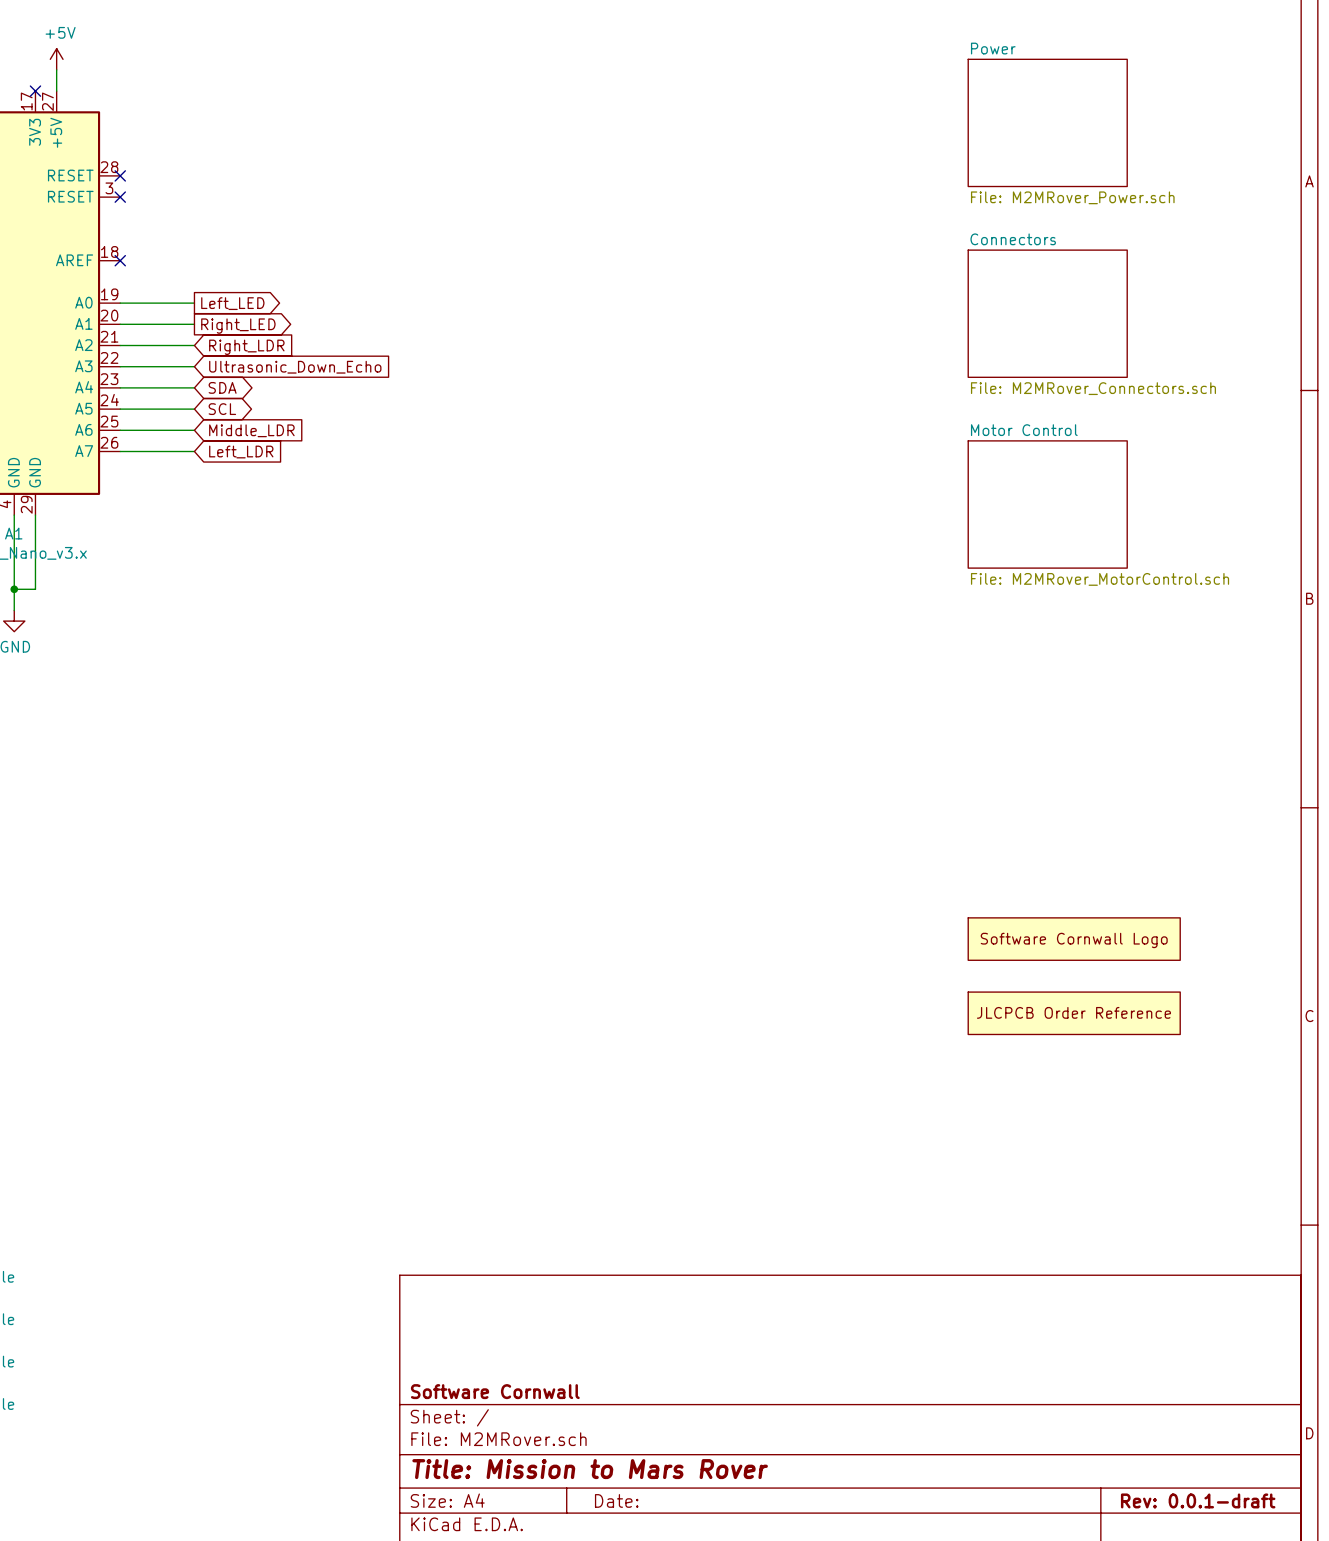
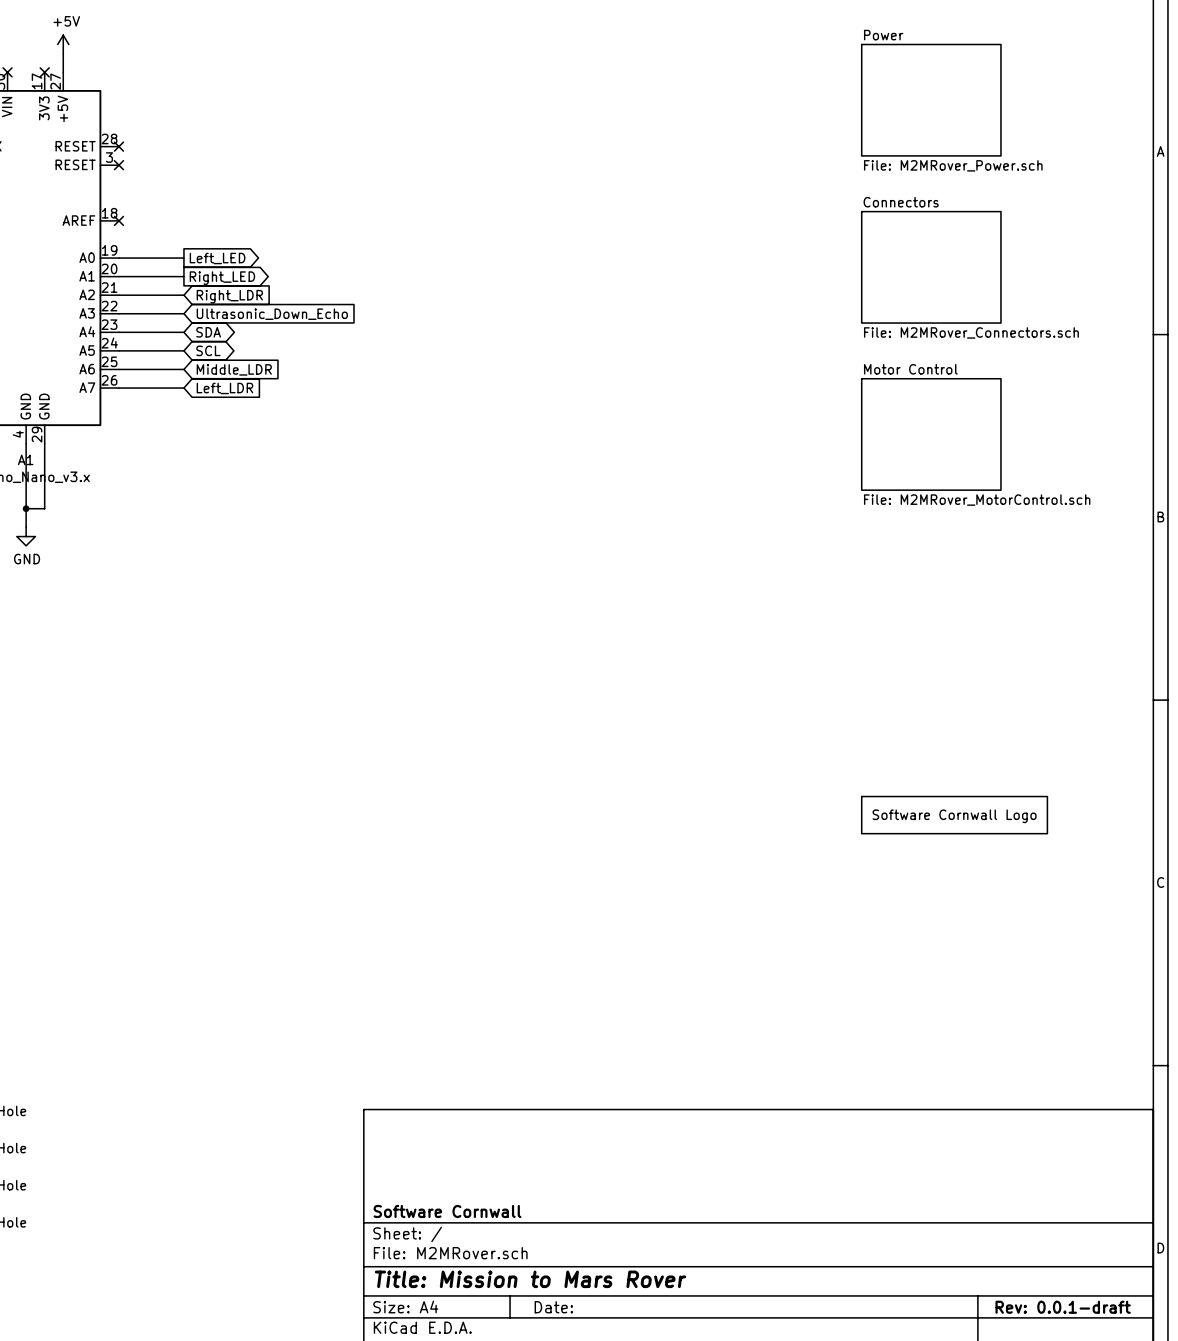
part: (1074, 1013) -> none

